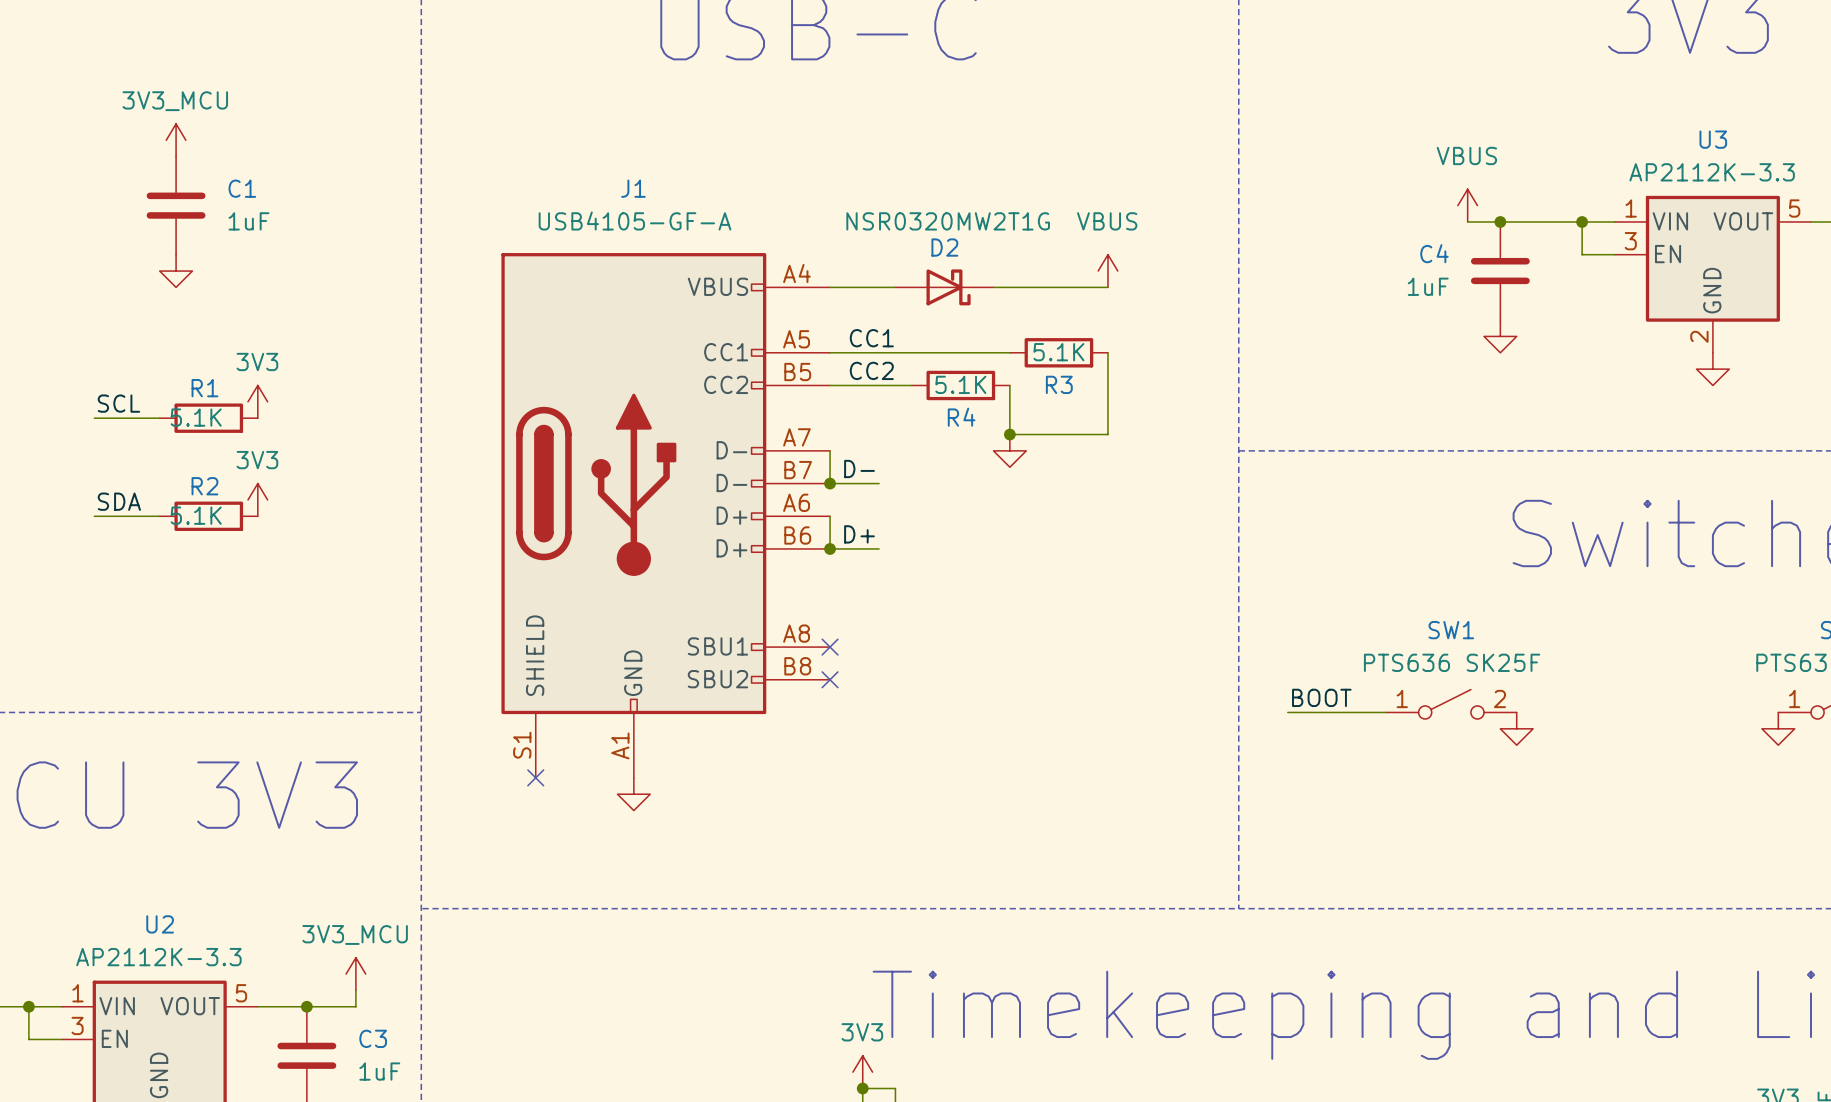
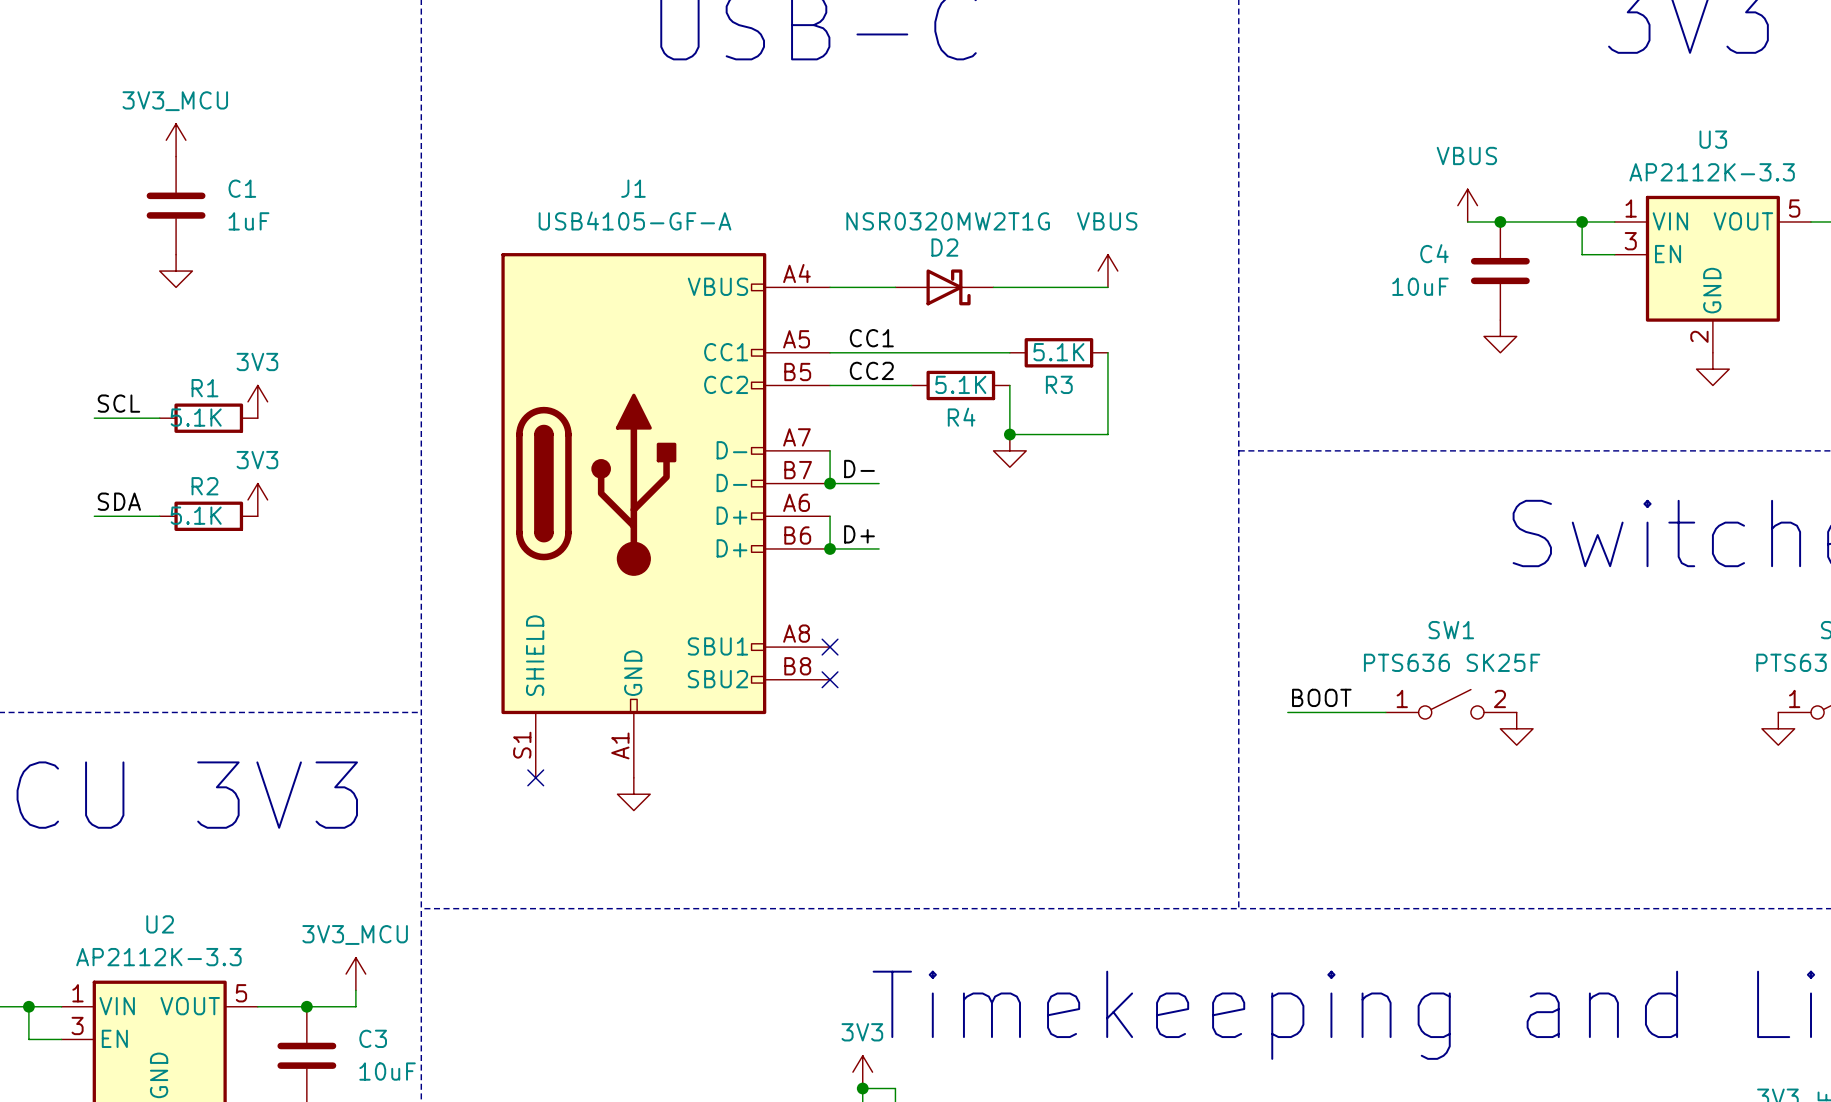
C4 value: 1uF (1428, 286) -> 10uF (1420, 286)
C3 value: 1uF (379, 1071) -> 10uF (387, 1071)

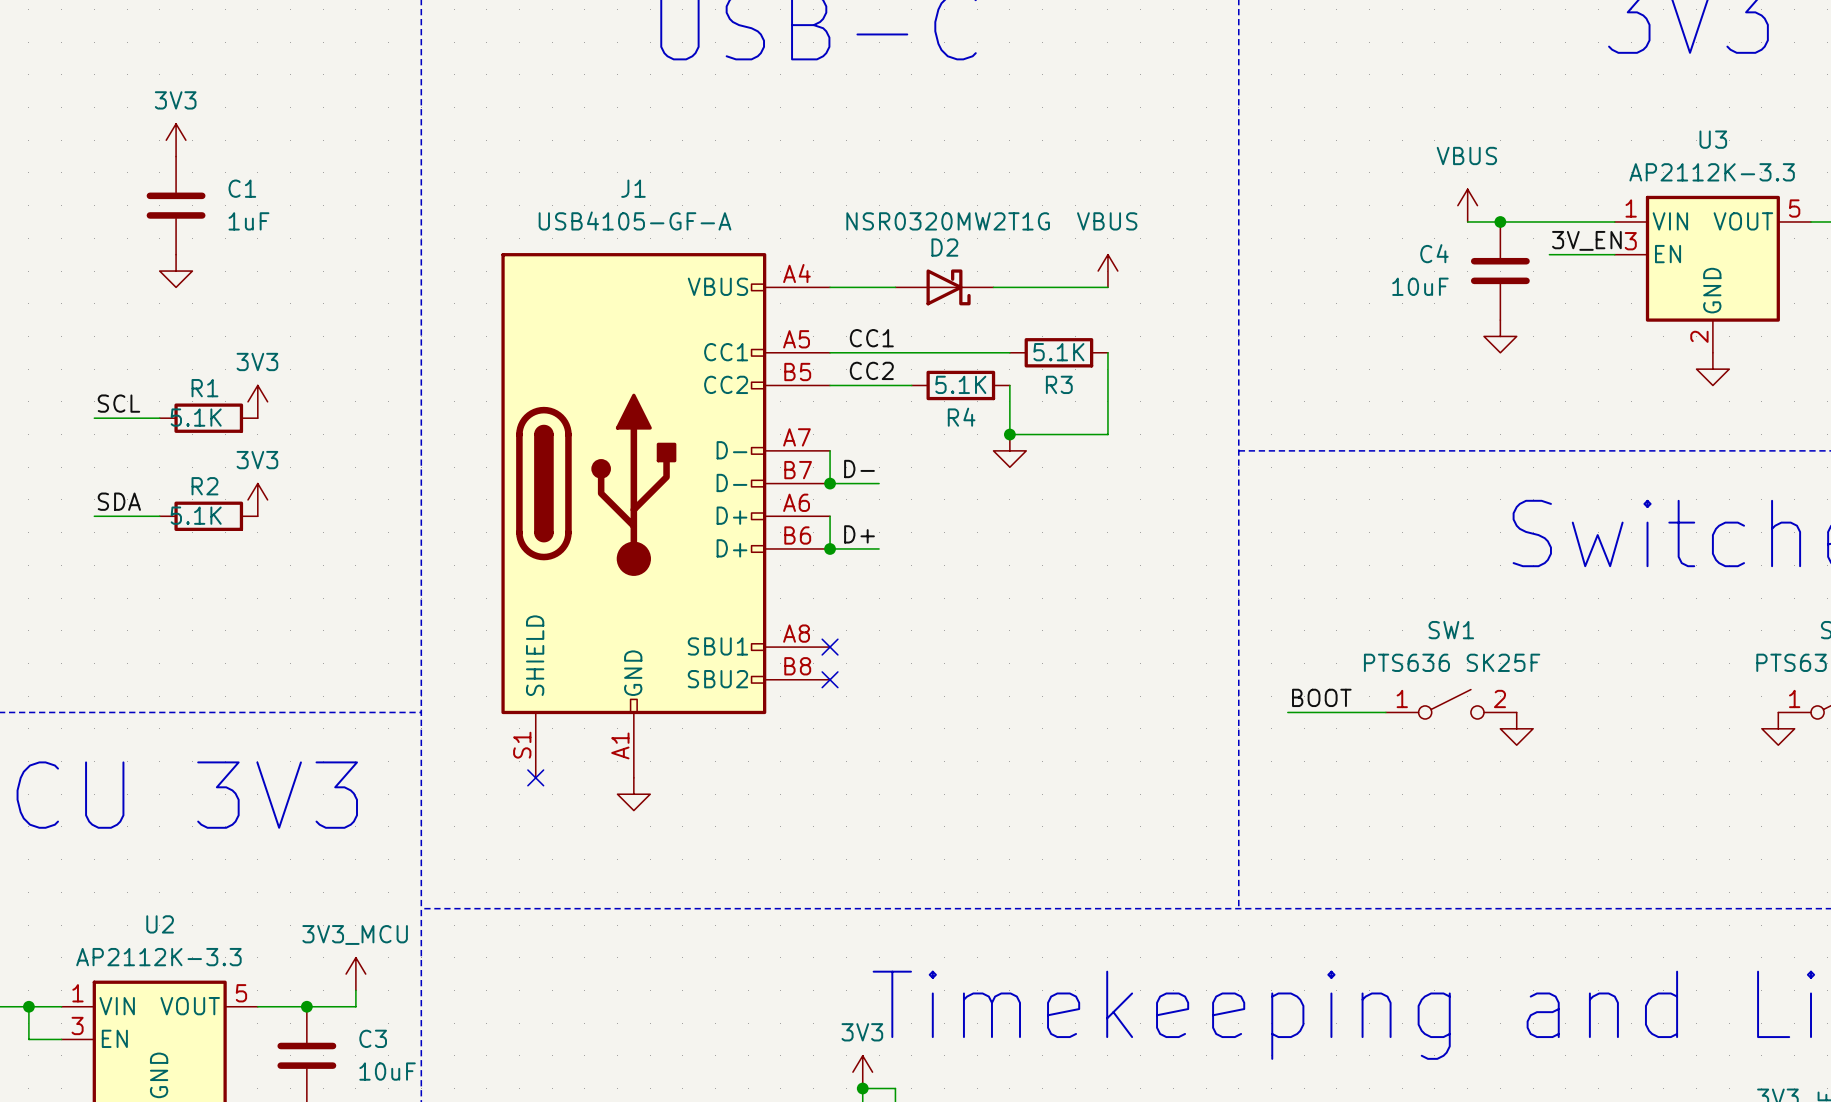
power symbol: 3V3_MCU (176, 140) -> 3V3 (176, 140)
wire: (1582, 221) (1582, 254) -> (1549, 254) (1582, 254)
junction: (1582, 221) -> none
label: none -> 3V_EN (1586, 240)

